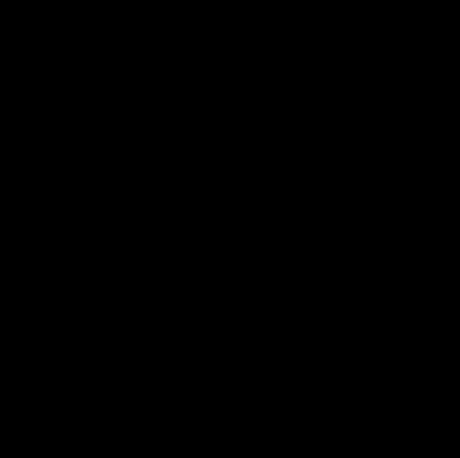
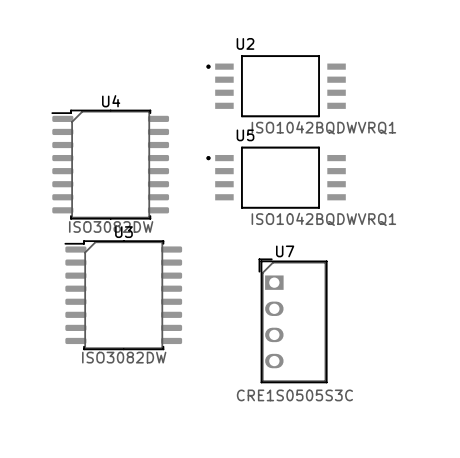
U2: none -> ISO1042BQDWVRQ1 (276, 86)
U4: none -> ISO3082DW (110, 164)
U5: none -> ISO1042BQDWVRQ1 (276, 177)
U3: none -> ISO3082DW (123, 295)
U7: none -> CRE1S0505S3C (293, 320)

